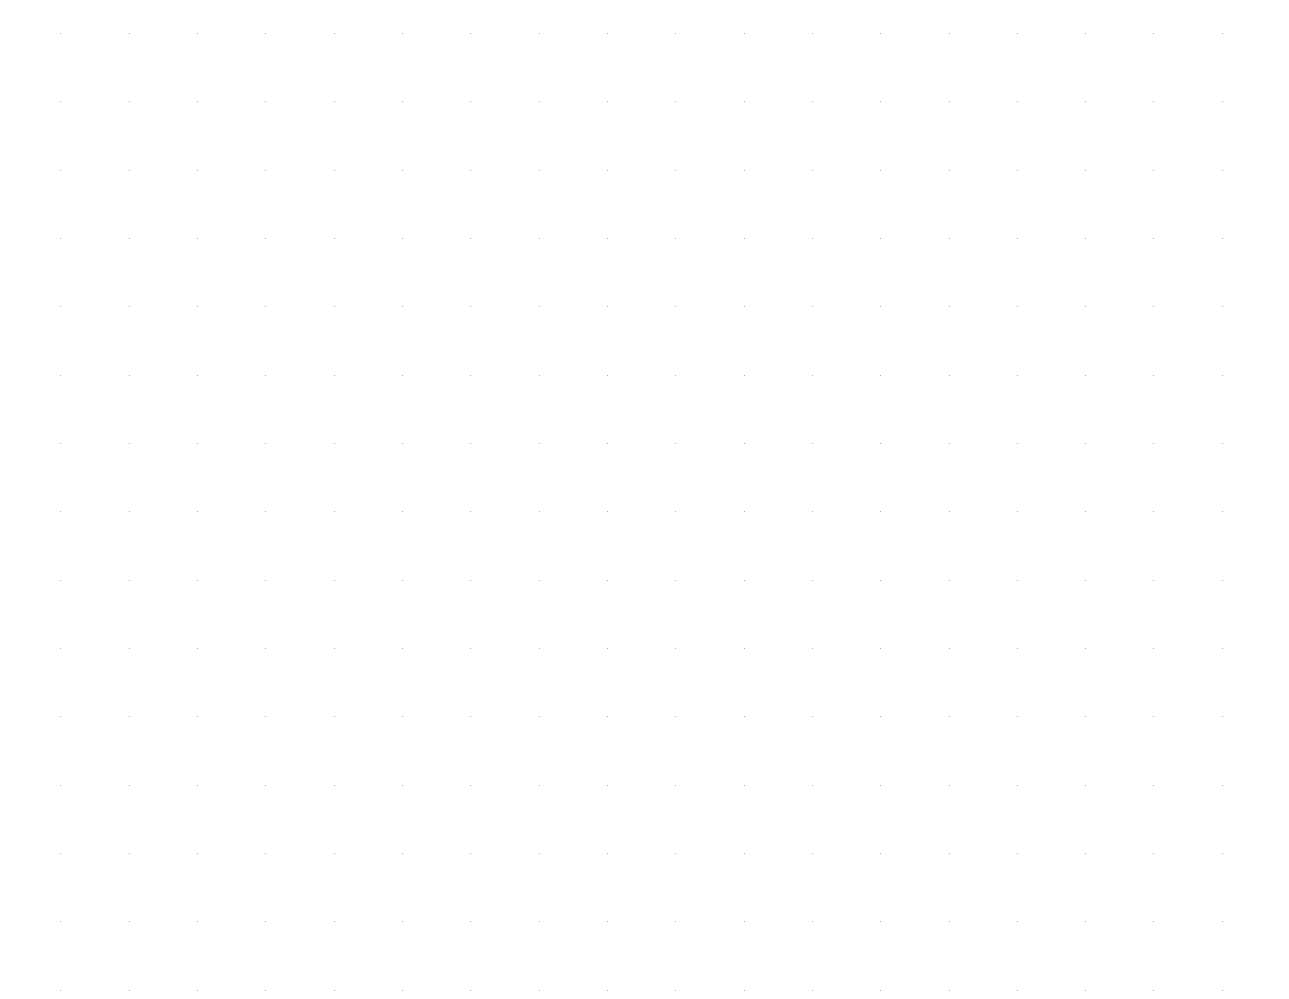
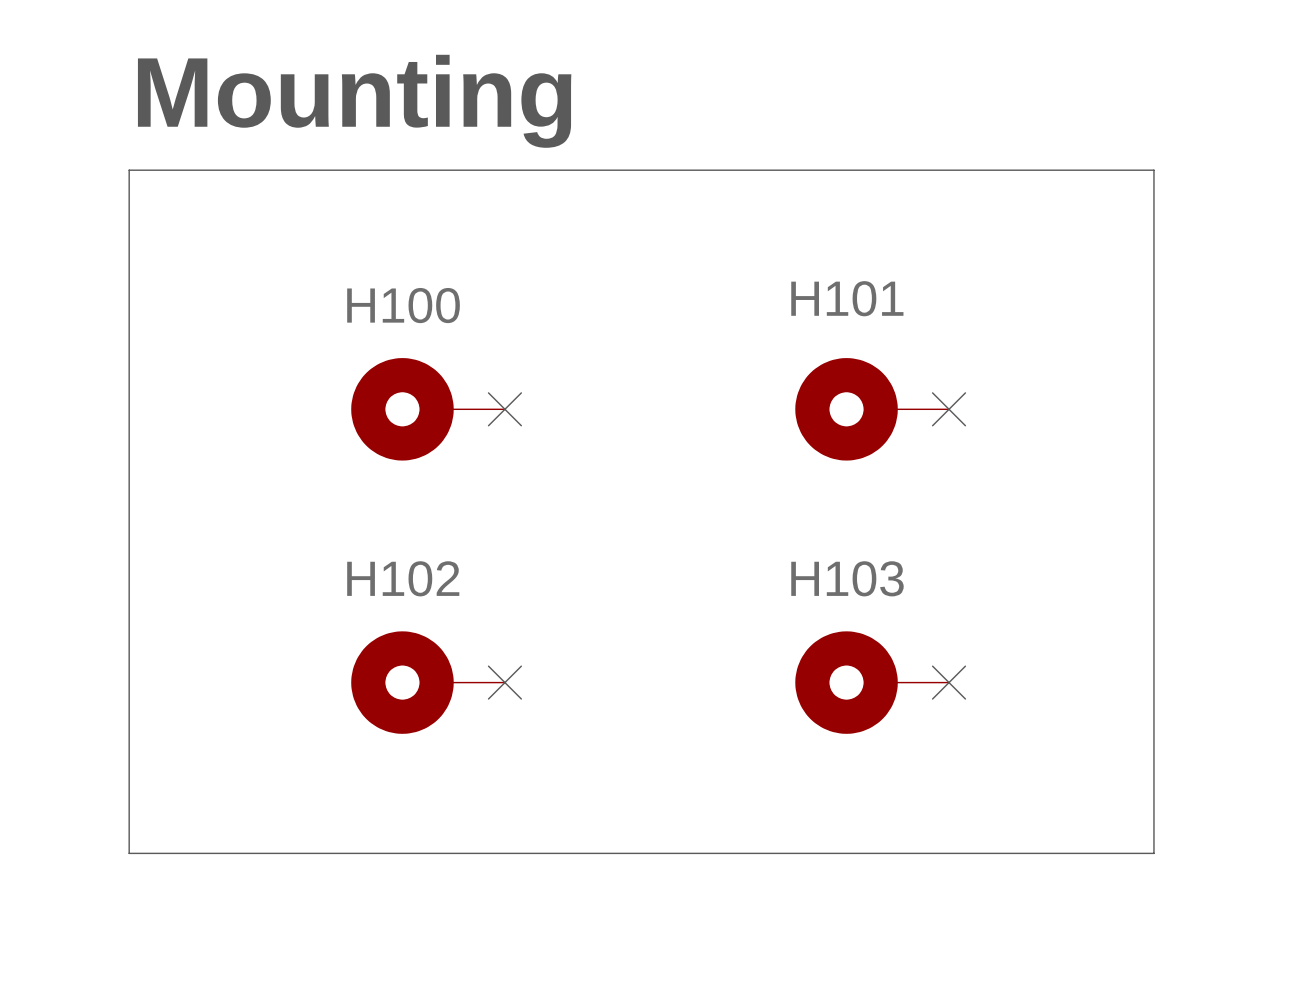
text: none -> Mounting (354, 101)
line: none -> (129, 170) (1153, 170) (1153, 853) (129, 853) (129, 170)
H100: none -> (428, 409)
no-connect mark: none -> (504, 409)
H101: none -> (872, 409)
no-connect mark: none -> (949, 409)
H102: none -> (428, 682)
no-connect mark: none -> (504, 682)
H103: none -> (872, 682)
no-connect mark: none -> (949, 682)

